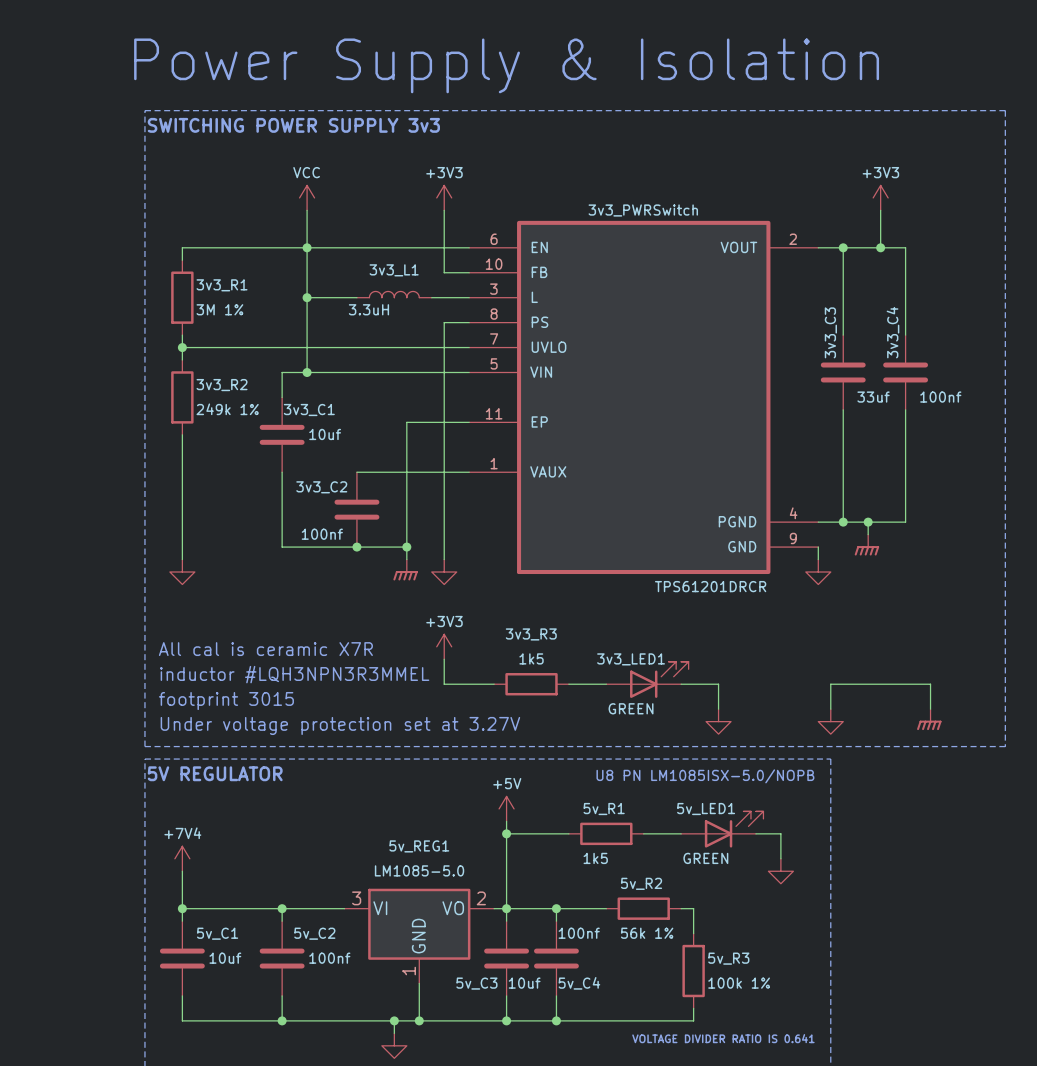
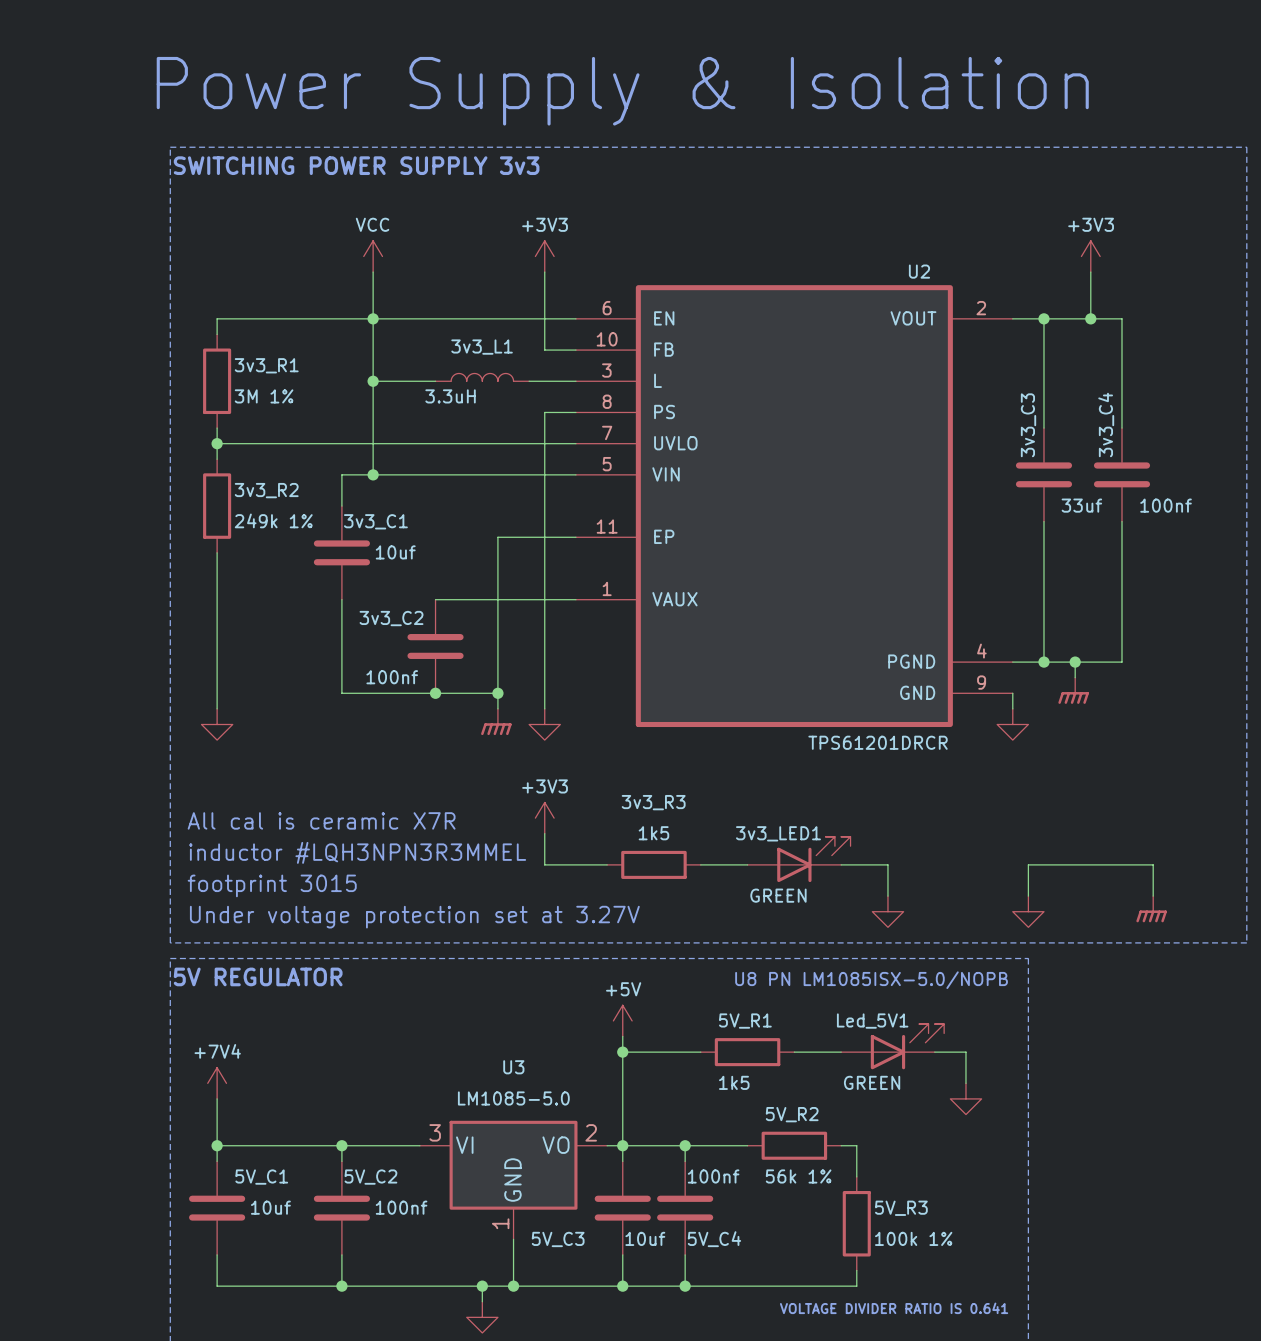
3v3_PWRSwitch name: 3v3_PWRSwitch (643, 210) -> U2 (919, 271)
5v_R1 name: 5v_R1 (604, 809) -> 5V_R1 (745, 1021)
5v_LED1 name: 5v_LED1 (706, 809) -> Led_5V1 (872, 1021)
5v_REG1 name: 5v_REG1 (419, 846) -> U3 (513, 1067)
5v_R2 name: 5v_R2 (641, 883) -> 5V_R2 (792, 1114)
5v_C1 name: 5v_C1 (217, 933) -> 5V_C1 (261, 1177)
5v_C2 name: 5v_C2 (314, 933) -> 5V_C2 (370, 1177)
5v_R3 name: 5v_R3 (728, 958) -> 5V_R3 (901, 1208)
5v_C3 name: 5v_C3 (476, 983) -> 5V_C3 (558, 1239)
5v_C4 name: 5v_C4 (579, 983) -> 5V_C4 (714, 1239)

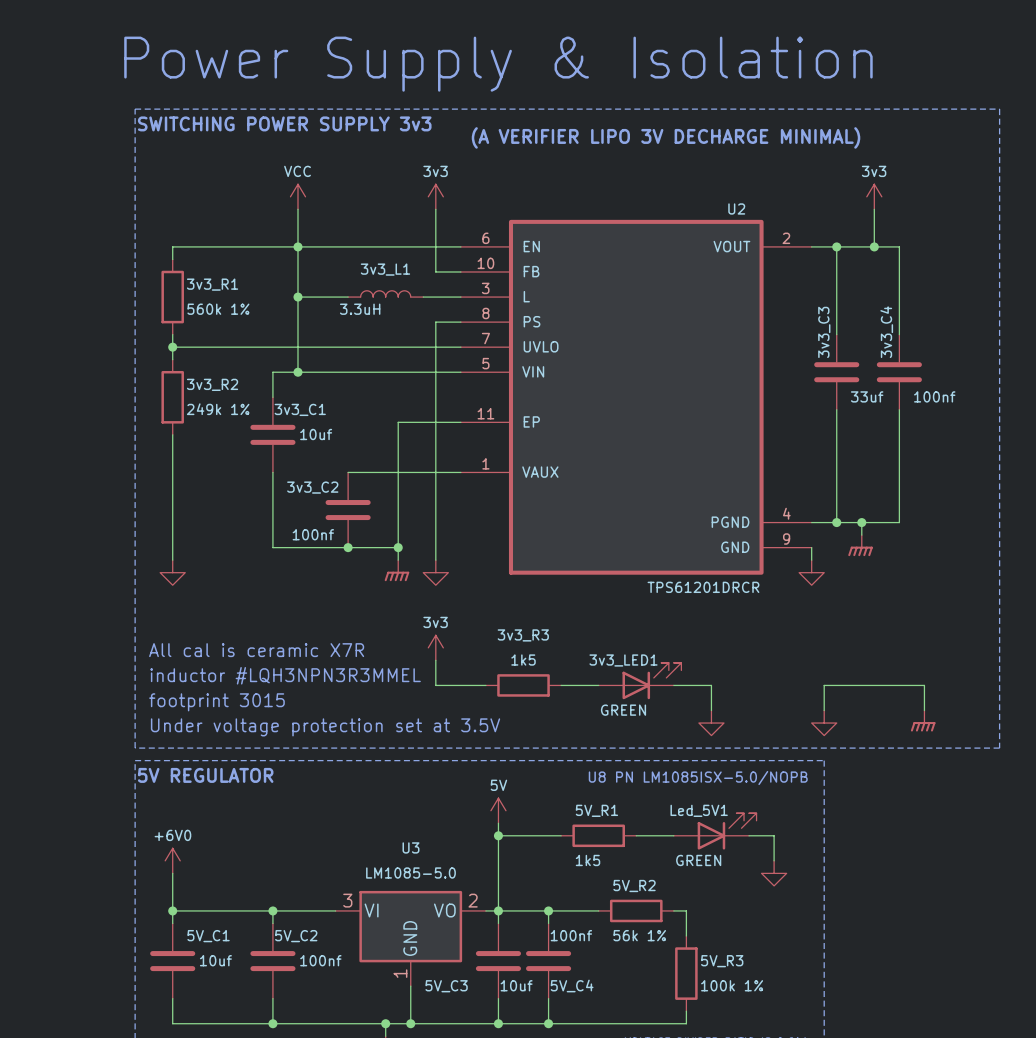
text: none -> (A VERIFIER LIPO 3V DECHARGE MINIMAL) (666, 137)
power symbol: +3V3 (544, 256) -> 3v3 (435, 196)
power symbol: +3V3 (1090, 256) -> 3v3 (874, 196)
3v3_R1 value: 3M 1% (264, 396) -> 560k 1% (218, 309)
power symbol: +3V3 (544, 818) -> 3v3 (435, 647)
text: Under voltage protection set at 3.27V (414, 917) -> Under voltage protection set at 3.5V (325, 727)
power symbol: +5V (622, 1020) -> 5V (498, 810)
power symbol: +7V4 (217, 1083) -> +6V0 (172, 860)

